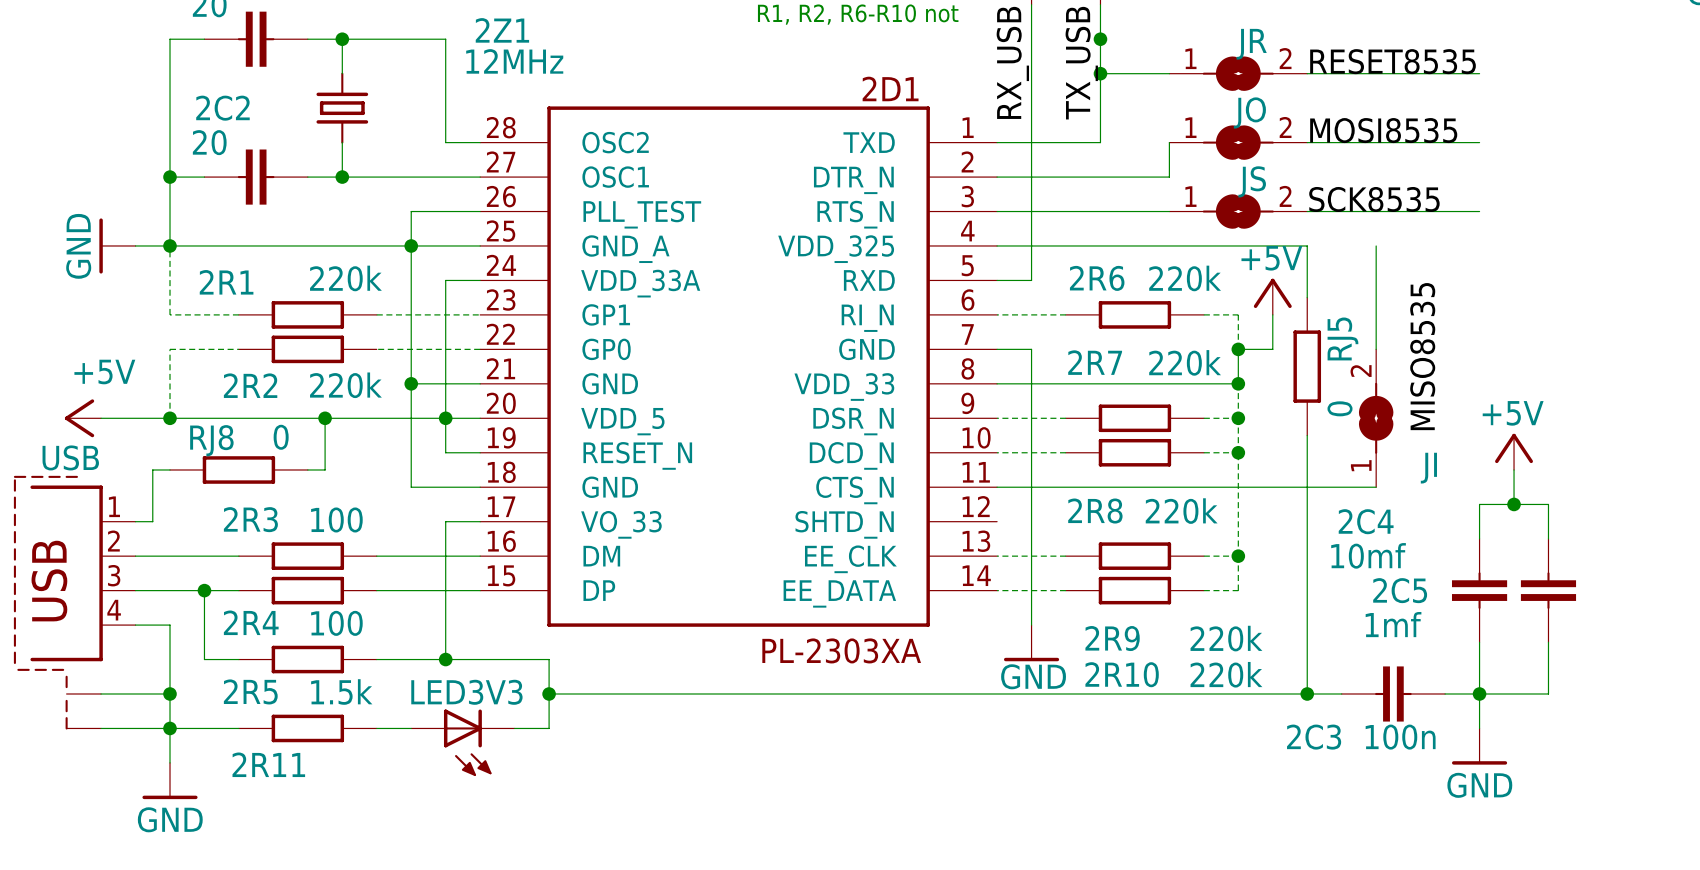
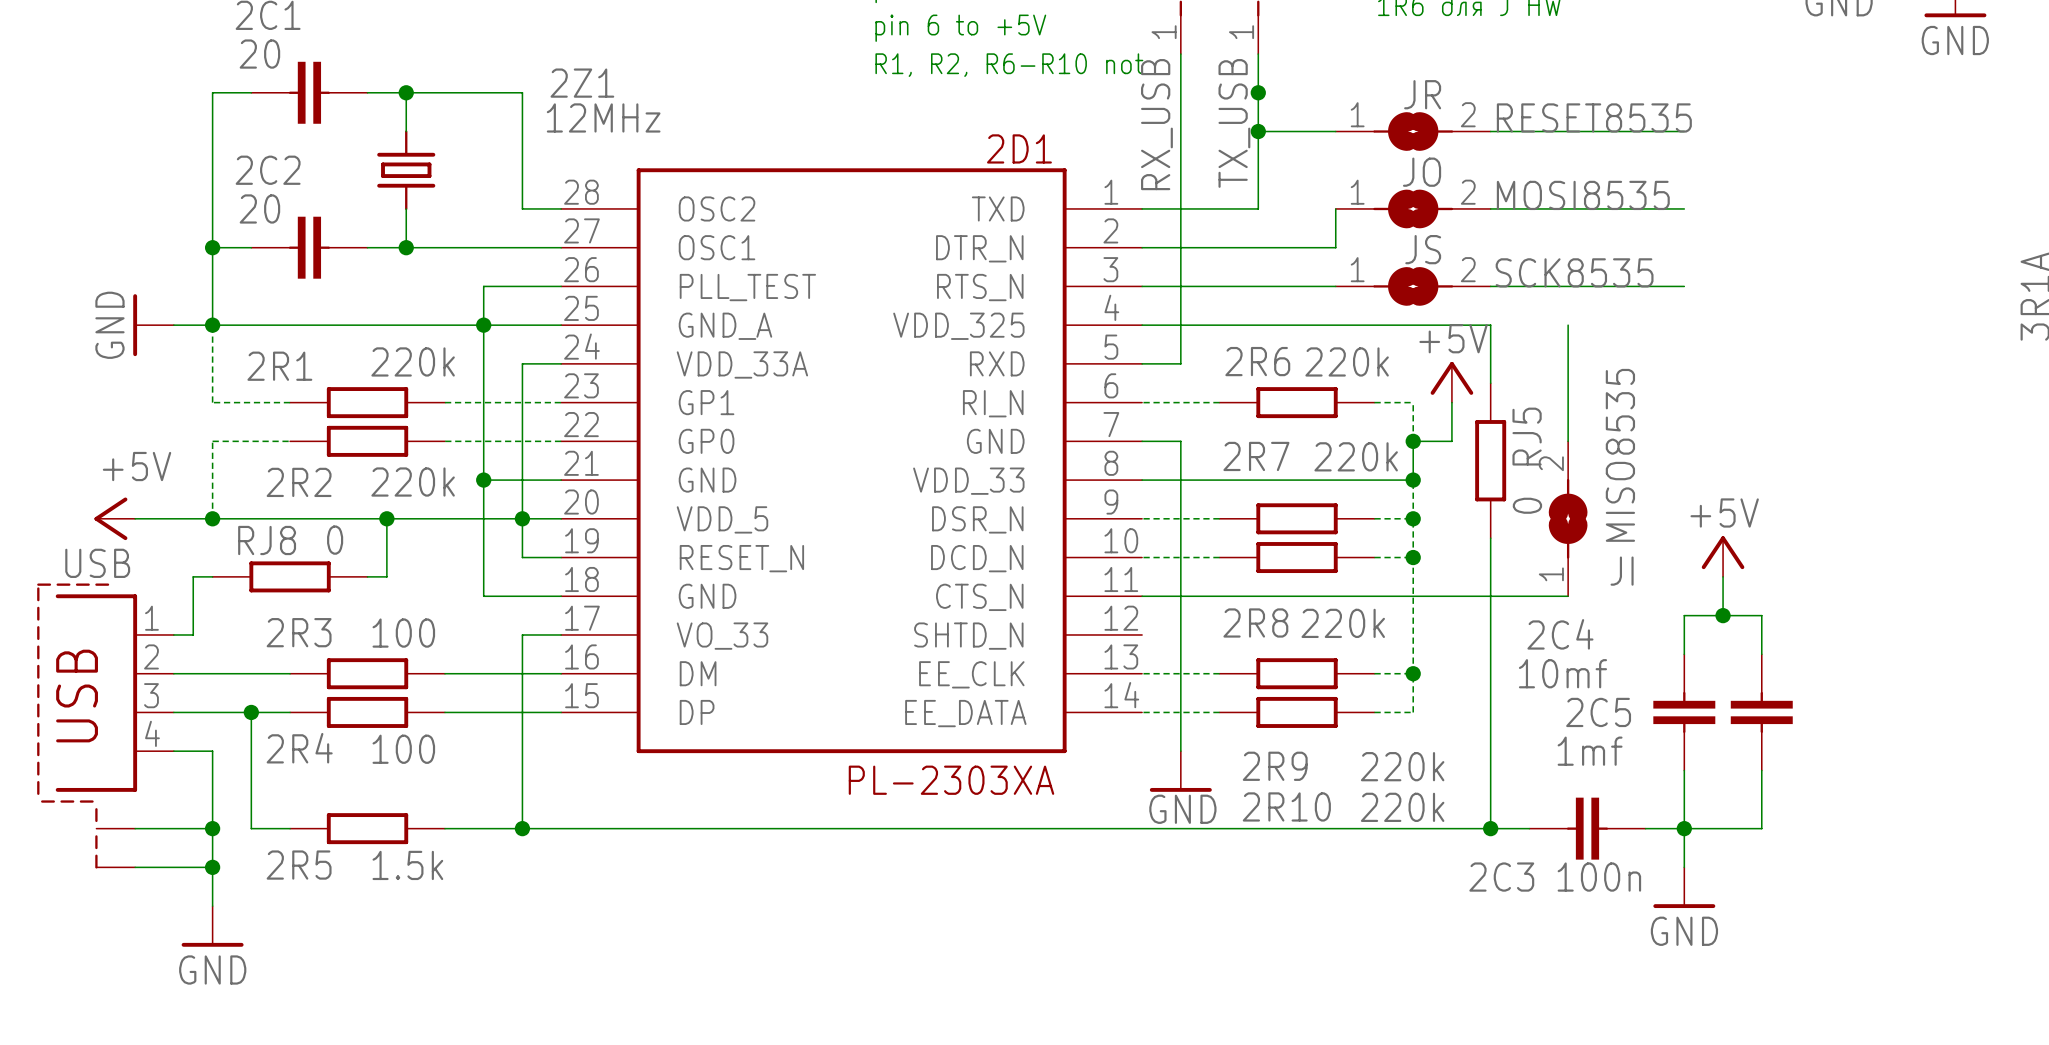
wire: (204, 659) (238, 659) -> (251, 789) (251, 828) (290, 828)
2R5 position: (307, 659) -> (367, 828)
wire: (376, 659) (549, 659) (549, 728) (514, 728) -> none
wire: none -> (522, 789) (522, 828)
junction position: (445, 659) -> (522, 828)
wire: none -> (444, 828) (638, 828)
junction: (549, 693) -> none
wire: (170, 728) (238, 728) -> none
2R11: (307, 728) -> none
wire: (376, 728) (411, 728) -> none
LED3V3: (462, 742) -> none

